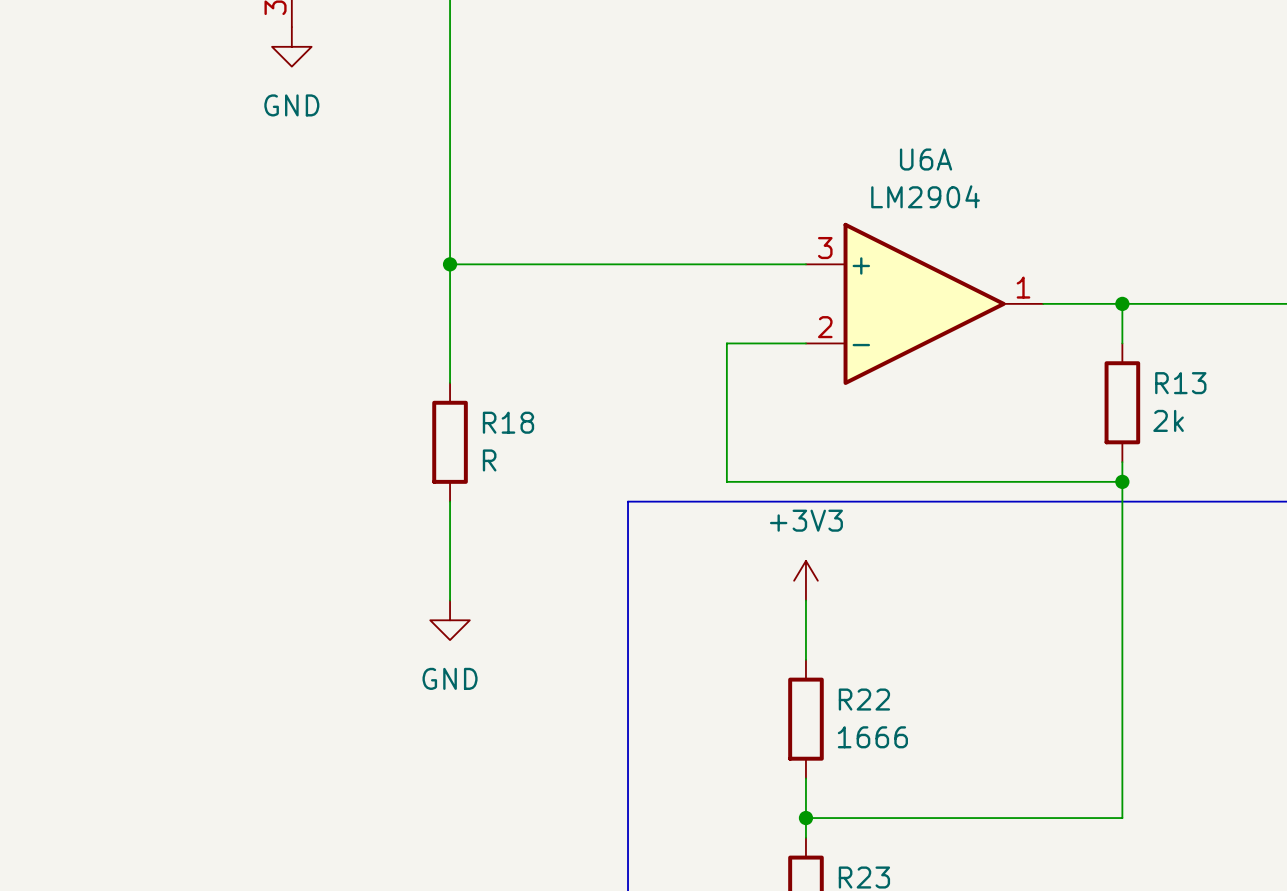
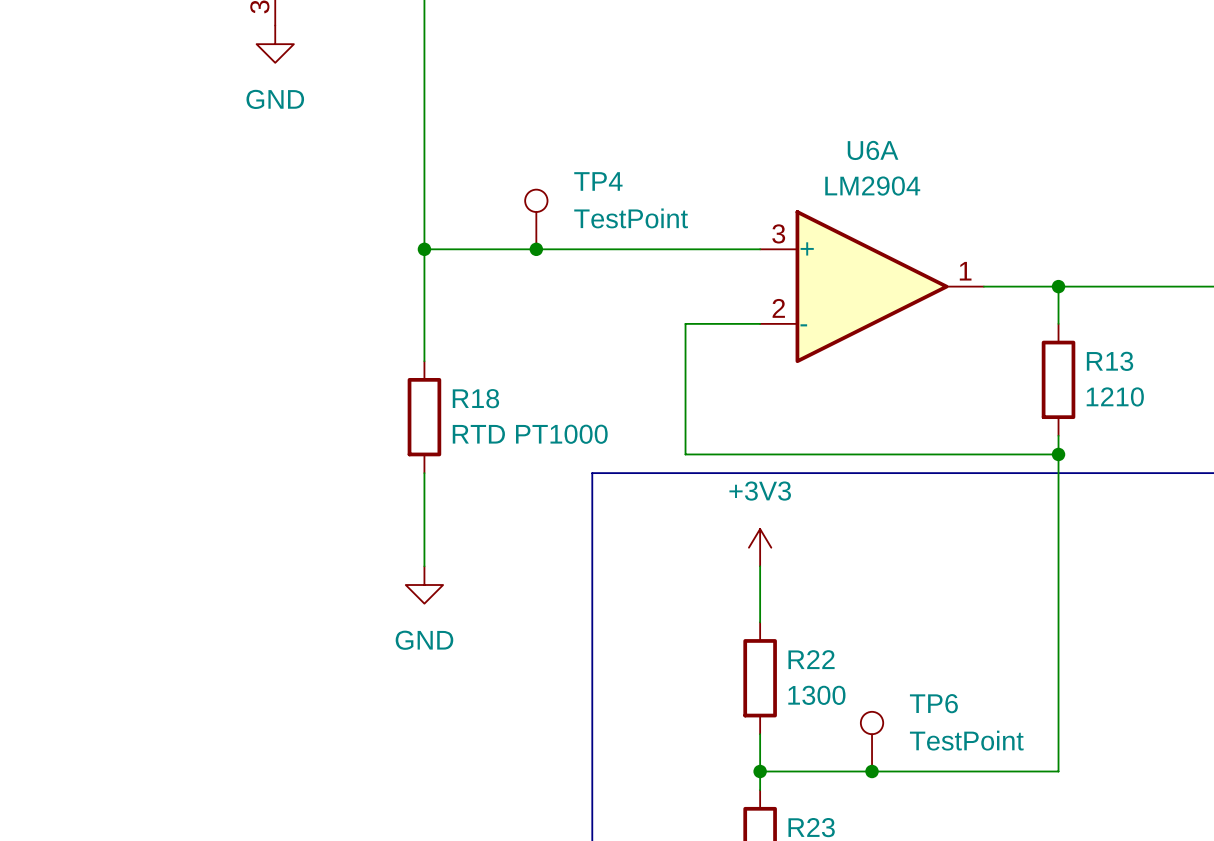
TP4: none -> TestPoint (536, 219)
junction: none -> (536, 249)
R13 value: 2k (1168, 420) -> 1210 (1115, 396)
R18 value: R (489, 460) -> RTD PT1000 (530, 434)
R22 value: 1666 (872, 737) -> 1300 (816, 695)
TP6: none -> TestPoint (872, 741)
junction: none -> (872, 771)

